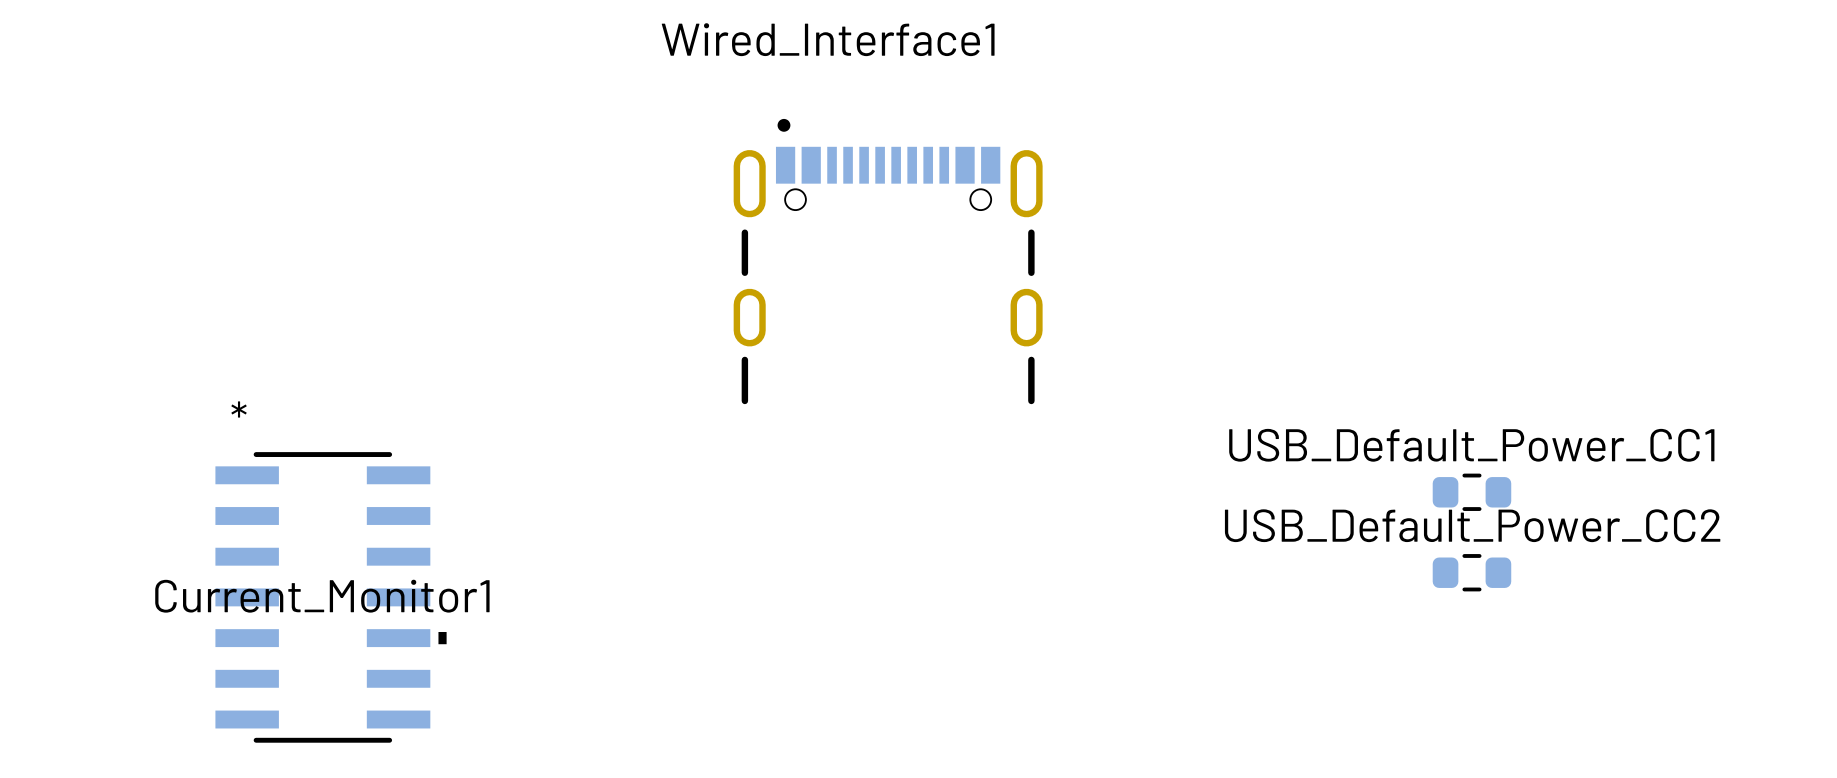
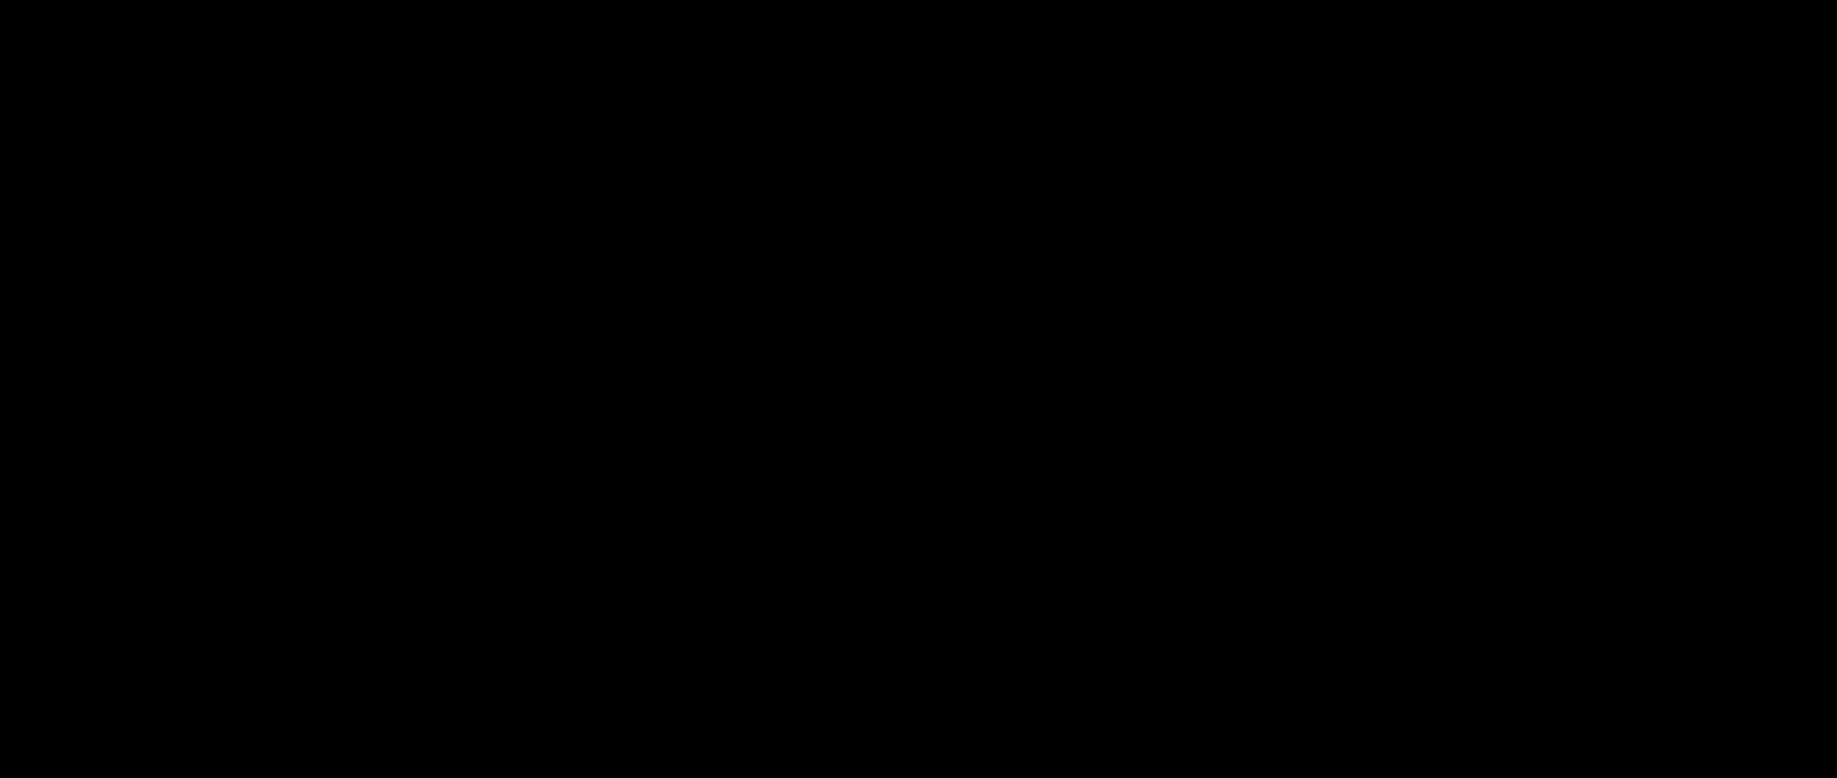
Wired_Interface1: (888, 261) -> none
USB_Default_Power_CC1: (1471, 492) -> none
USB_Default_Power_CC2: (1471, 572) -> none
Current_Monitor1: (331, 597) -> none

